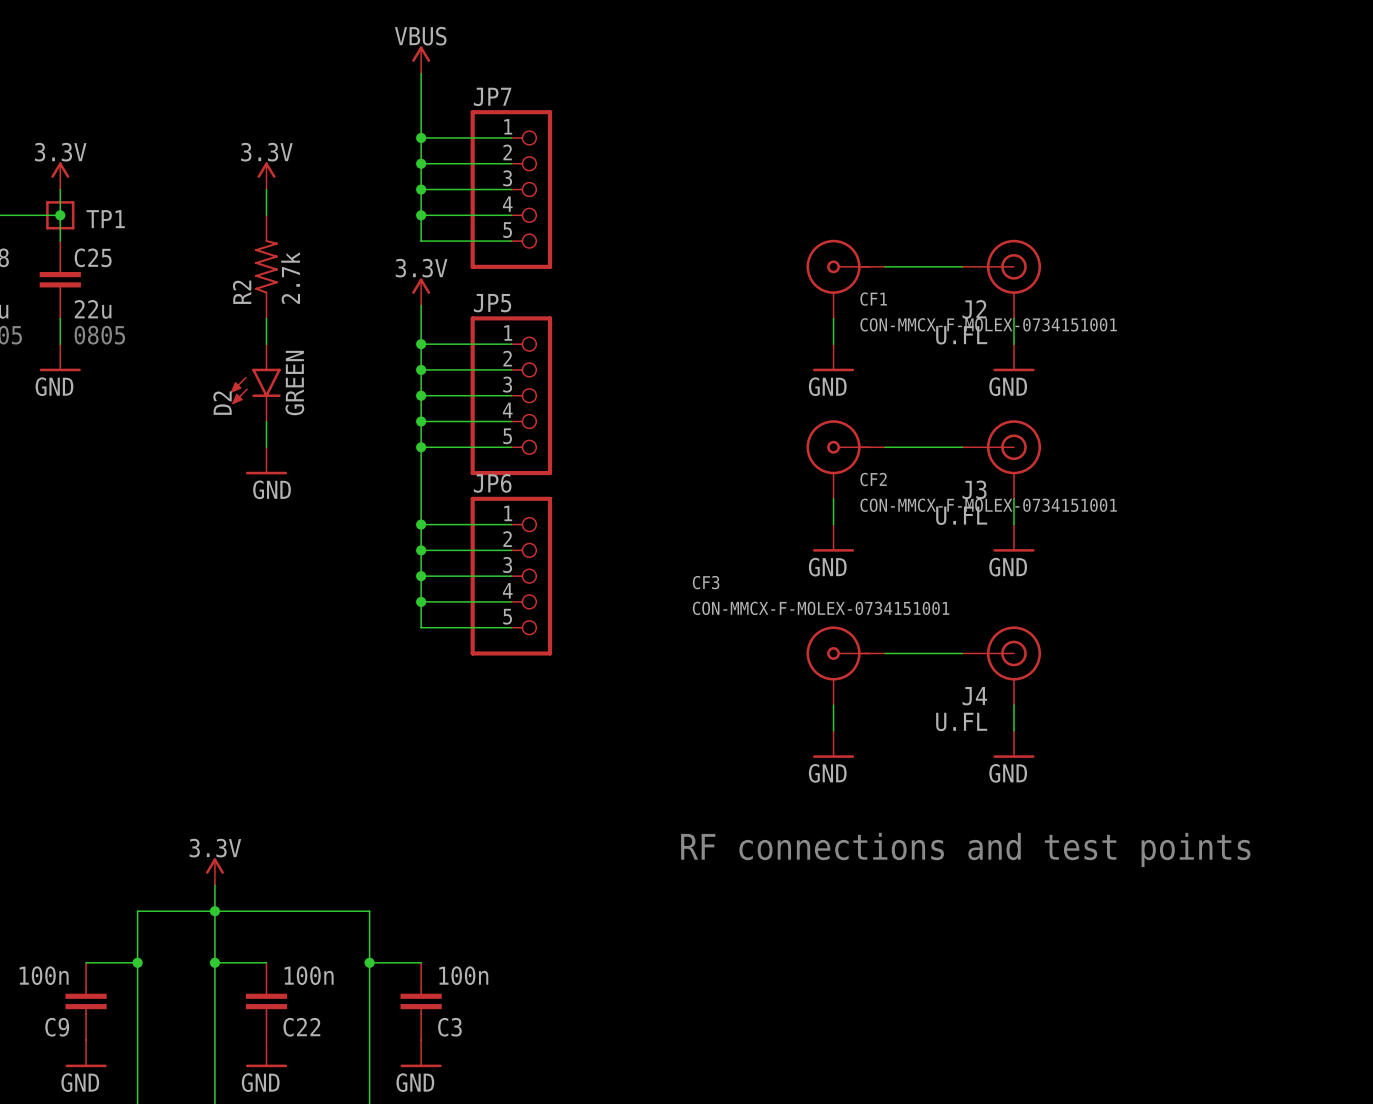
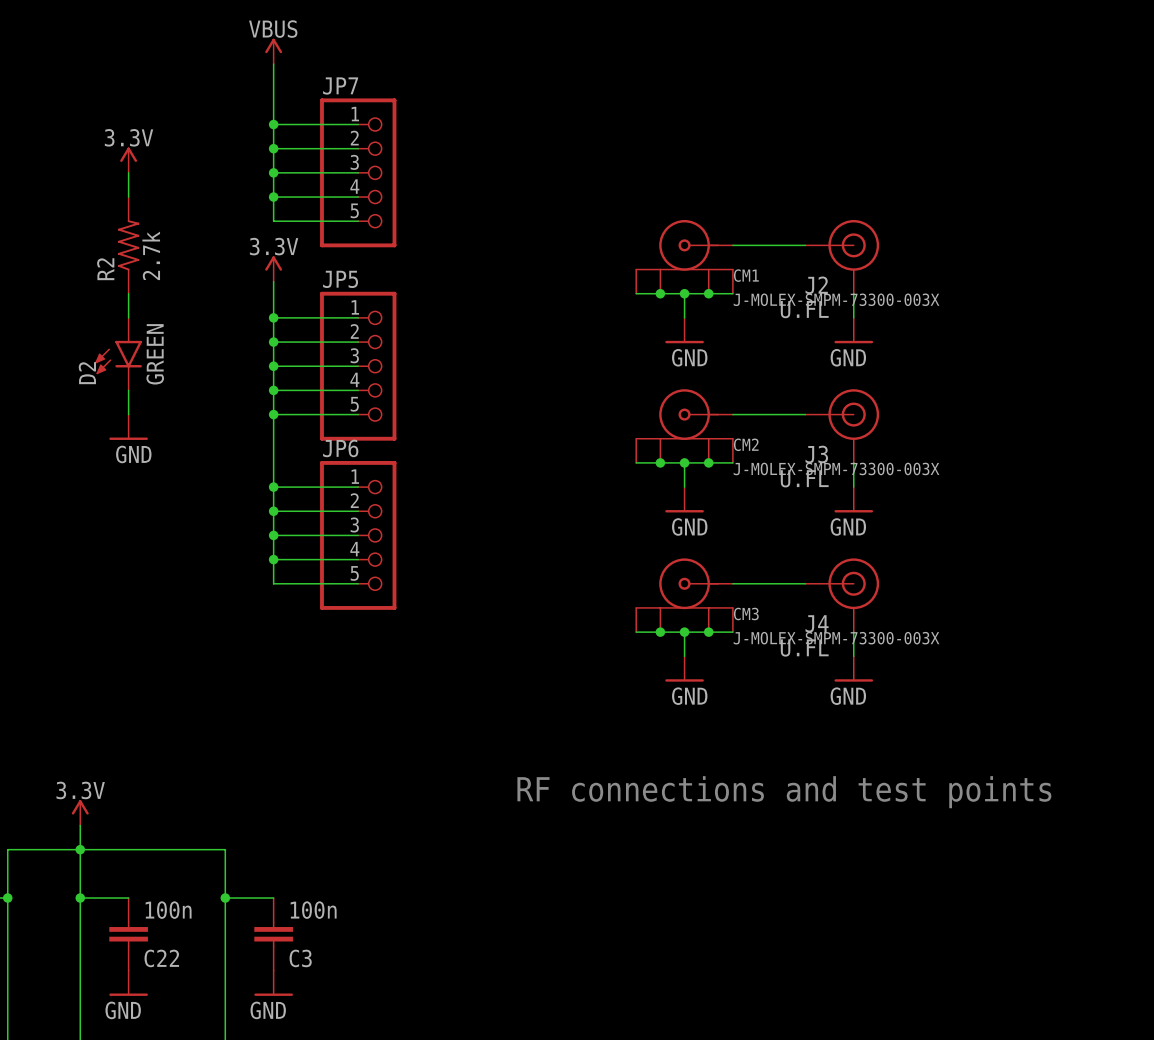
CF1: CON-MMCX-F-MOLEX-0734151001 (845, 279) -> none
CM1: none -> J-MOLEX-SMPM-73300-003X (684, 256)
J2 position: (1001, 279) -> (842, 256)
wire: none -> (636, 293) (732, 293)
wire: (833, 318) (833, 344) -> (684, 293) (684, 317)
junction: none -> (660, 293)
junction: none -> (684, 293)
junction: none -> (708, 293)
wire: (1013, 318) (1013, 344) -> (853, 293) (853, 317)
power symbol position: GND (833, 357) -> GND (684, 330)
power symbol position: GND (1013, 357) -> GND (853, 330)
power symbol text position: GND (827, 386) -> GND (689, 357)
CF2: CON-MMCX-F-MOLEX-0734151001 (845, 459) -> none
CM2: none -> J-MOLEX-SMPM-73300-003X (684, 426)
J3 position: (1001, 459) -> (842, 426)
wire: none -> (636, 462) (732, 462)
wire: (833, 498) (833, 524) -> (684, 462) (684, 487)
junction: none -> (660, 462)
junction: none -> (684, 462)
junction: none -> (708, 462)
wire: (1013, 498) (1013, 524) -> (853, 462) (853, 487)
power symbol position: GND (833, 538) -> GND (684, 499)
power symbol position: GND (1013, 538) -> GND (853, 499)
power symbol text position: GND (827, 567) -> GND (689, 526)
CM3: none -> J-MOLEX-SMPM-73300-003X (684, 595)
wire: (885, 653) (962, 653) -> (732, 583) (805, 583)
CF3: CON-MMCX-F-MOLEX-0734151001 (845, 665) -> none
J4 position: (1001, 665) -> (842, 595)
wire: none -> (636, 632) (732, 632)
junction: none -> (660, 632)
junction: none -> (684, 632)
junction: none -> (708, 632)
wire: (833, 705) (833, 730) -> (684, 632) (684, 656)
wire: (1013, 705) (1013, 730) -> (853, 632) (853, 656)
power symbol position: GND (833, 744) -> GND (684, 668)
power symbol position: GND (1013, 744) -> GND (853, 668)
power symbol text position: GND (827, 773) -> GND (689, 696)

